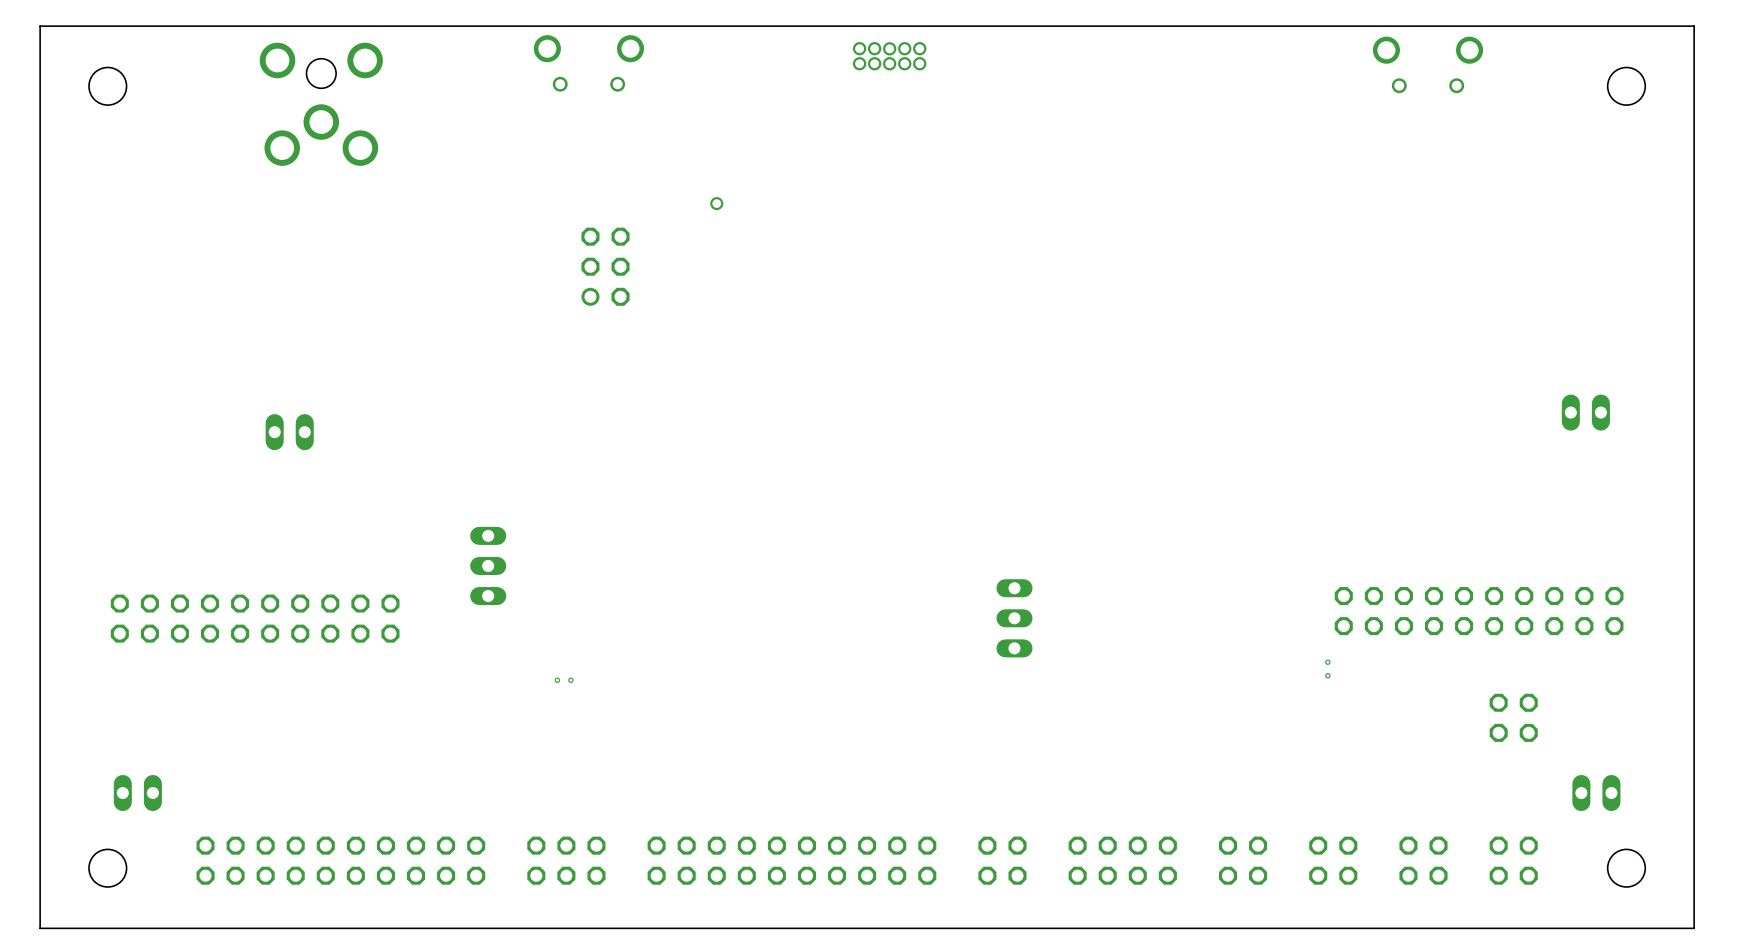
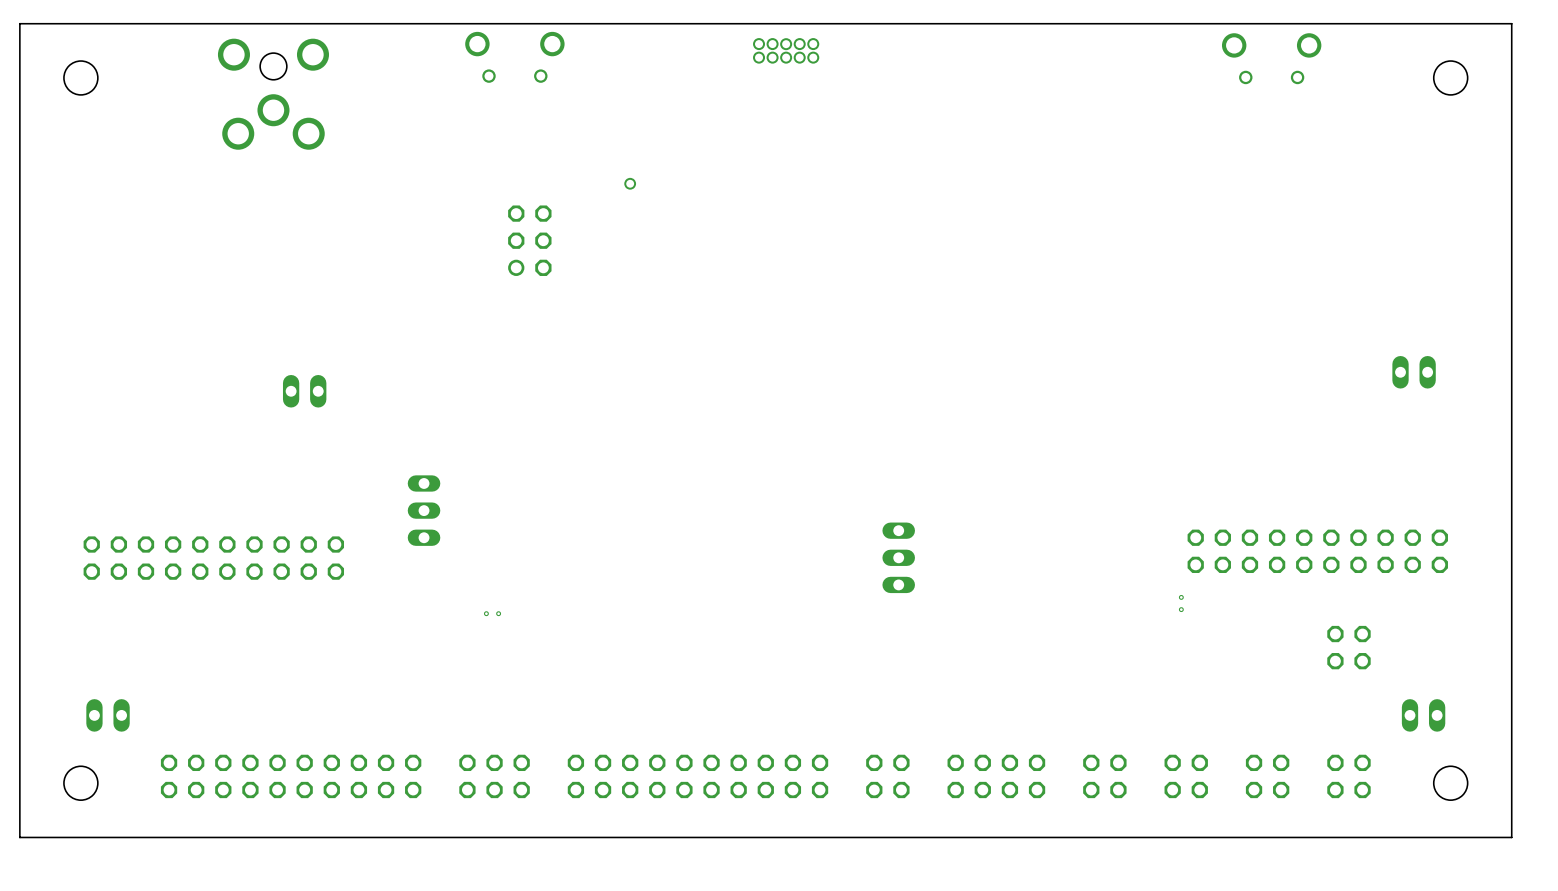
part position: (289, 432) -> (304, 391)

